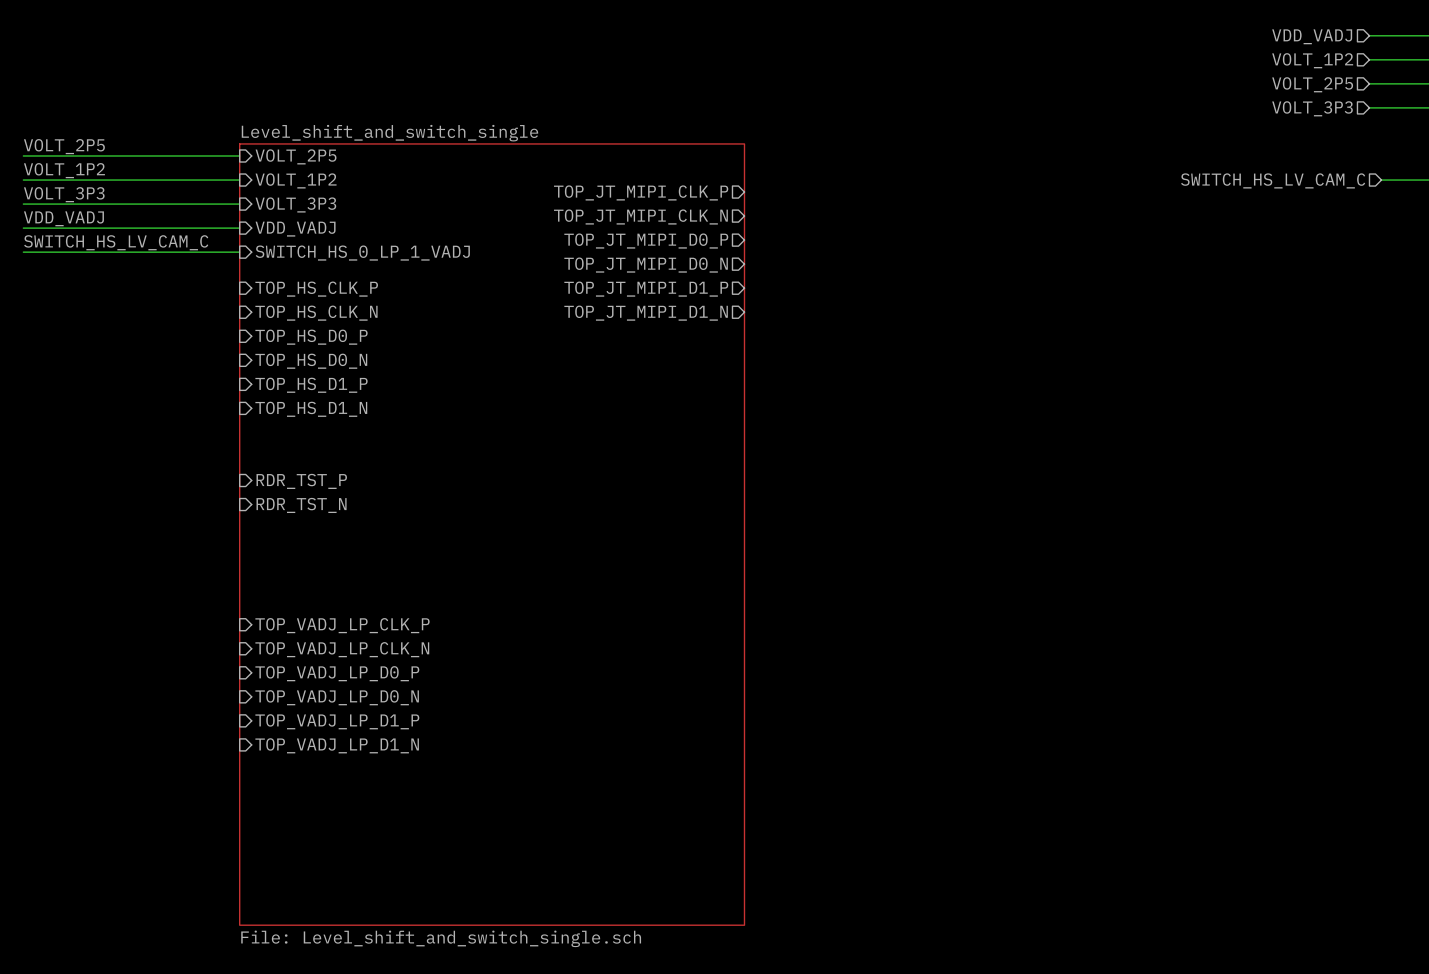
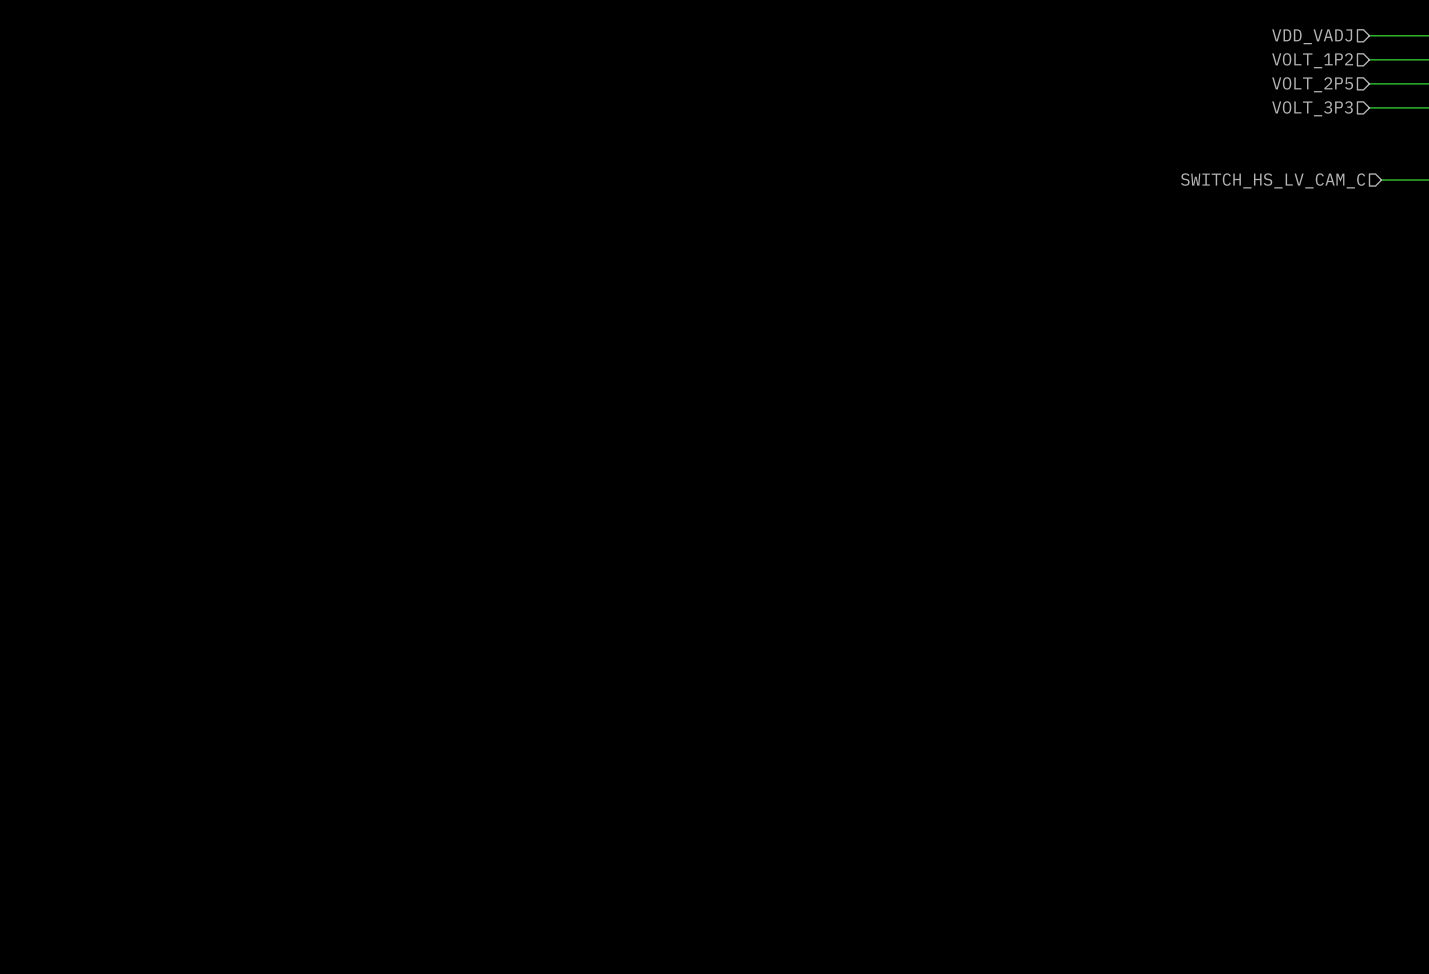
label: VOLT_2P5 (64, 146) -> none
wire: (23, 155) (239, 155) -> none
sheet pin: VOLT_2P5 (296, 156) -> none
label: VOLT_1P2 (64, 170) -> none
wire: (23, 180) (239, 180) -> none
sheet pin: VOLT_1P2 (296, 180) -> none
sheet pin: TOP_JT_MIPI_CLK_P (641, 192) -> none
label: VOLT_3P3 (64, 194) -> none
wire: (23, 204) (239, 204) -> none
sheet pin: VOLT_3P3 (295, 204) -> none
sheet pin: TOP_JT_MIPI_CLK_N (640, 216) -> none
label: VDD_VADJ (63, 218) -> none
wire: (23, 228) (239, 228) -> none
sheet pin: VDD_VADJ (295, 229) -> none
sheet pin: TOP_JT_MIPI_D0_P (646, 241) -> none
label: SWITCH_HS_LV_CAM_C (116, 242) -> none
wire: (23, 252) (239, 252) -> none
sheet pin: SWITCH_HS_0_LP_1_VADJ (362, 253) -> none
sheet pin: TOP_JT_MIPI_D0_N (646, 265) -> none
sheet pin: TOP_HS_CLK_P (316, 289) -> none
sheet pin: TOP_JT_MIPI_D1_P (646, 289) -> none
sheet pin: TOP_HS_CLK_N (316, 313) -> none
sheet pin: TOP_JT_MIPI_D1_N (646, 313) -> none
sheet pin: TOP_HS_D0_P (311, 337) -> none
sheet pin: TOP_HS_D0_N (311, 361) -> none
sheet pin: TOP_HS_D1_P (311, 385) -> none
sheet pin: TOP_HS_D1_N (311, 409) -> none
sheet pin: RDR_TST_P (301, 481) -> none
sheet pin: RDR_TST_N (301, 505) -> none
sheet Level_shift_and_switch_single: File: Level_shift_and_switch_single.sch (492, 534) -> none
sheet pin: TOP_VADJ_LP_CLK_P (342, 625) -> none
sheet pin: TOP_VADJ_LP_CLK_N (342, 649) -> none
sheet pin: TOP_VADJ_LP_D0_P (337, 673) -> none
sheet pin: TOP_VADJ_LP_D0_N (337, 697) -> none
sheet pin: TOP_VADJ_LP_D1_P (337, 721) -> none
sheet pin: TOP_VADJ_LP_D1_N (337, 745) -> none

